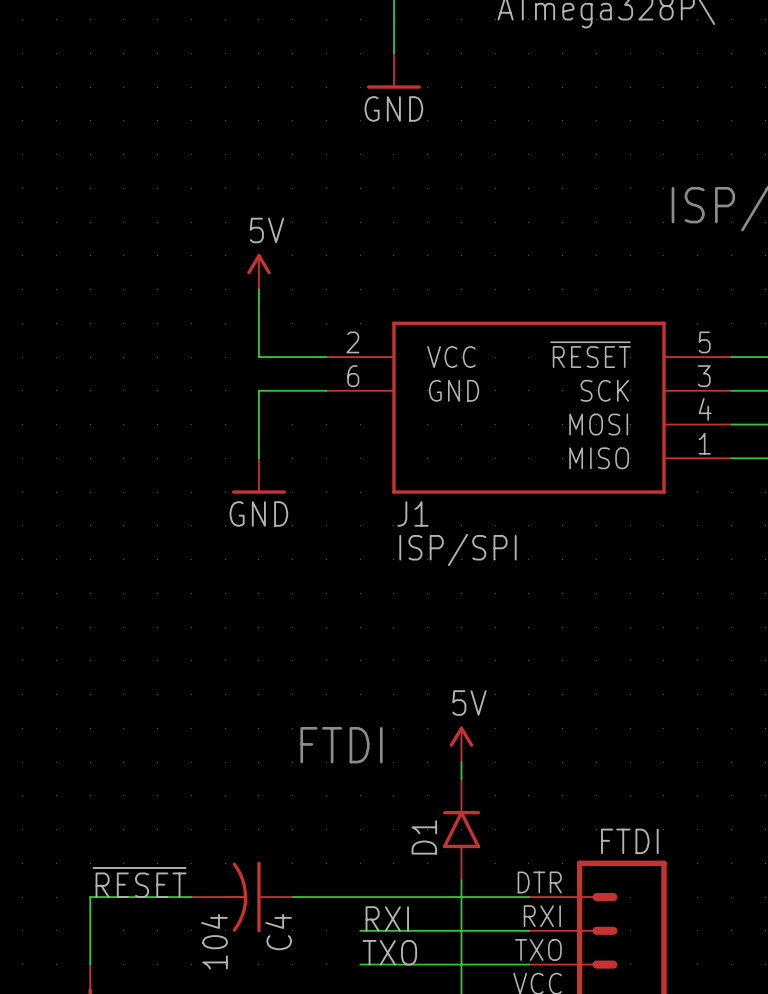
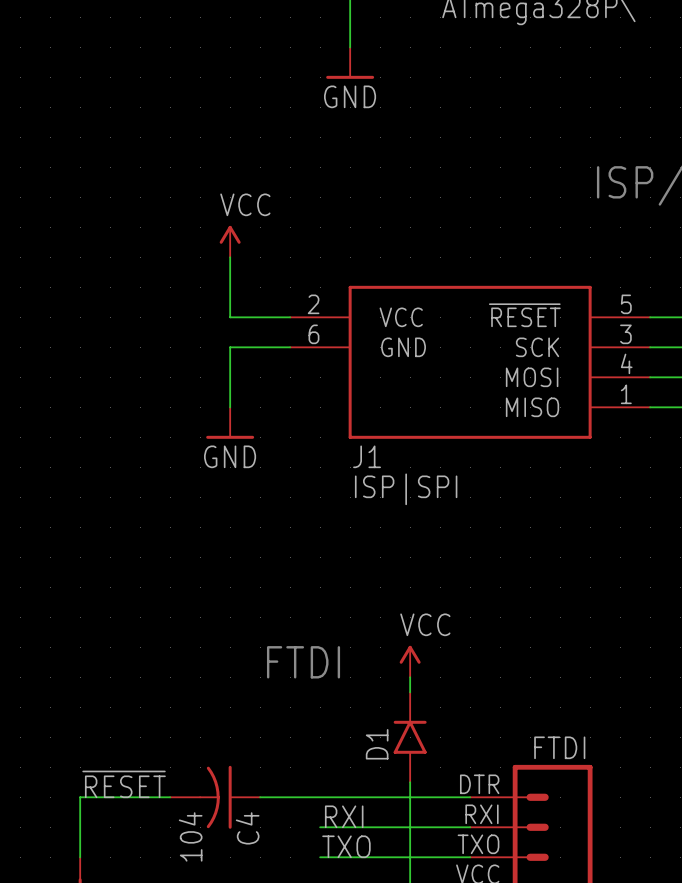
power symbol: 5V (258, 271) -> VCC (230, 241)
J1 value: ISP/SPI (457, 549) -> ISP|SPI (406, 489)
power symbol: 5V (461, 744) -> VCC (410, 661)

